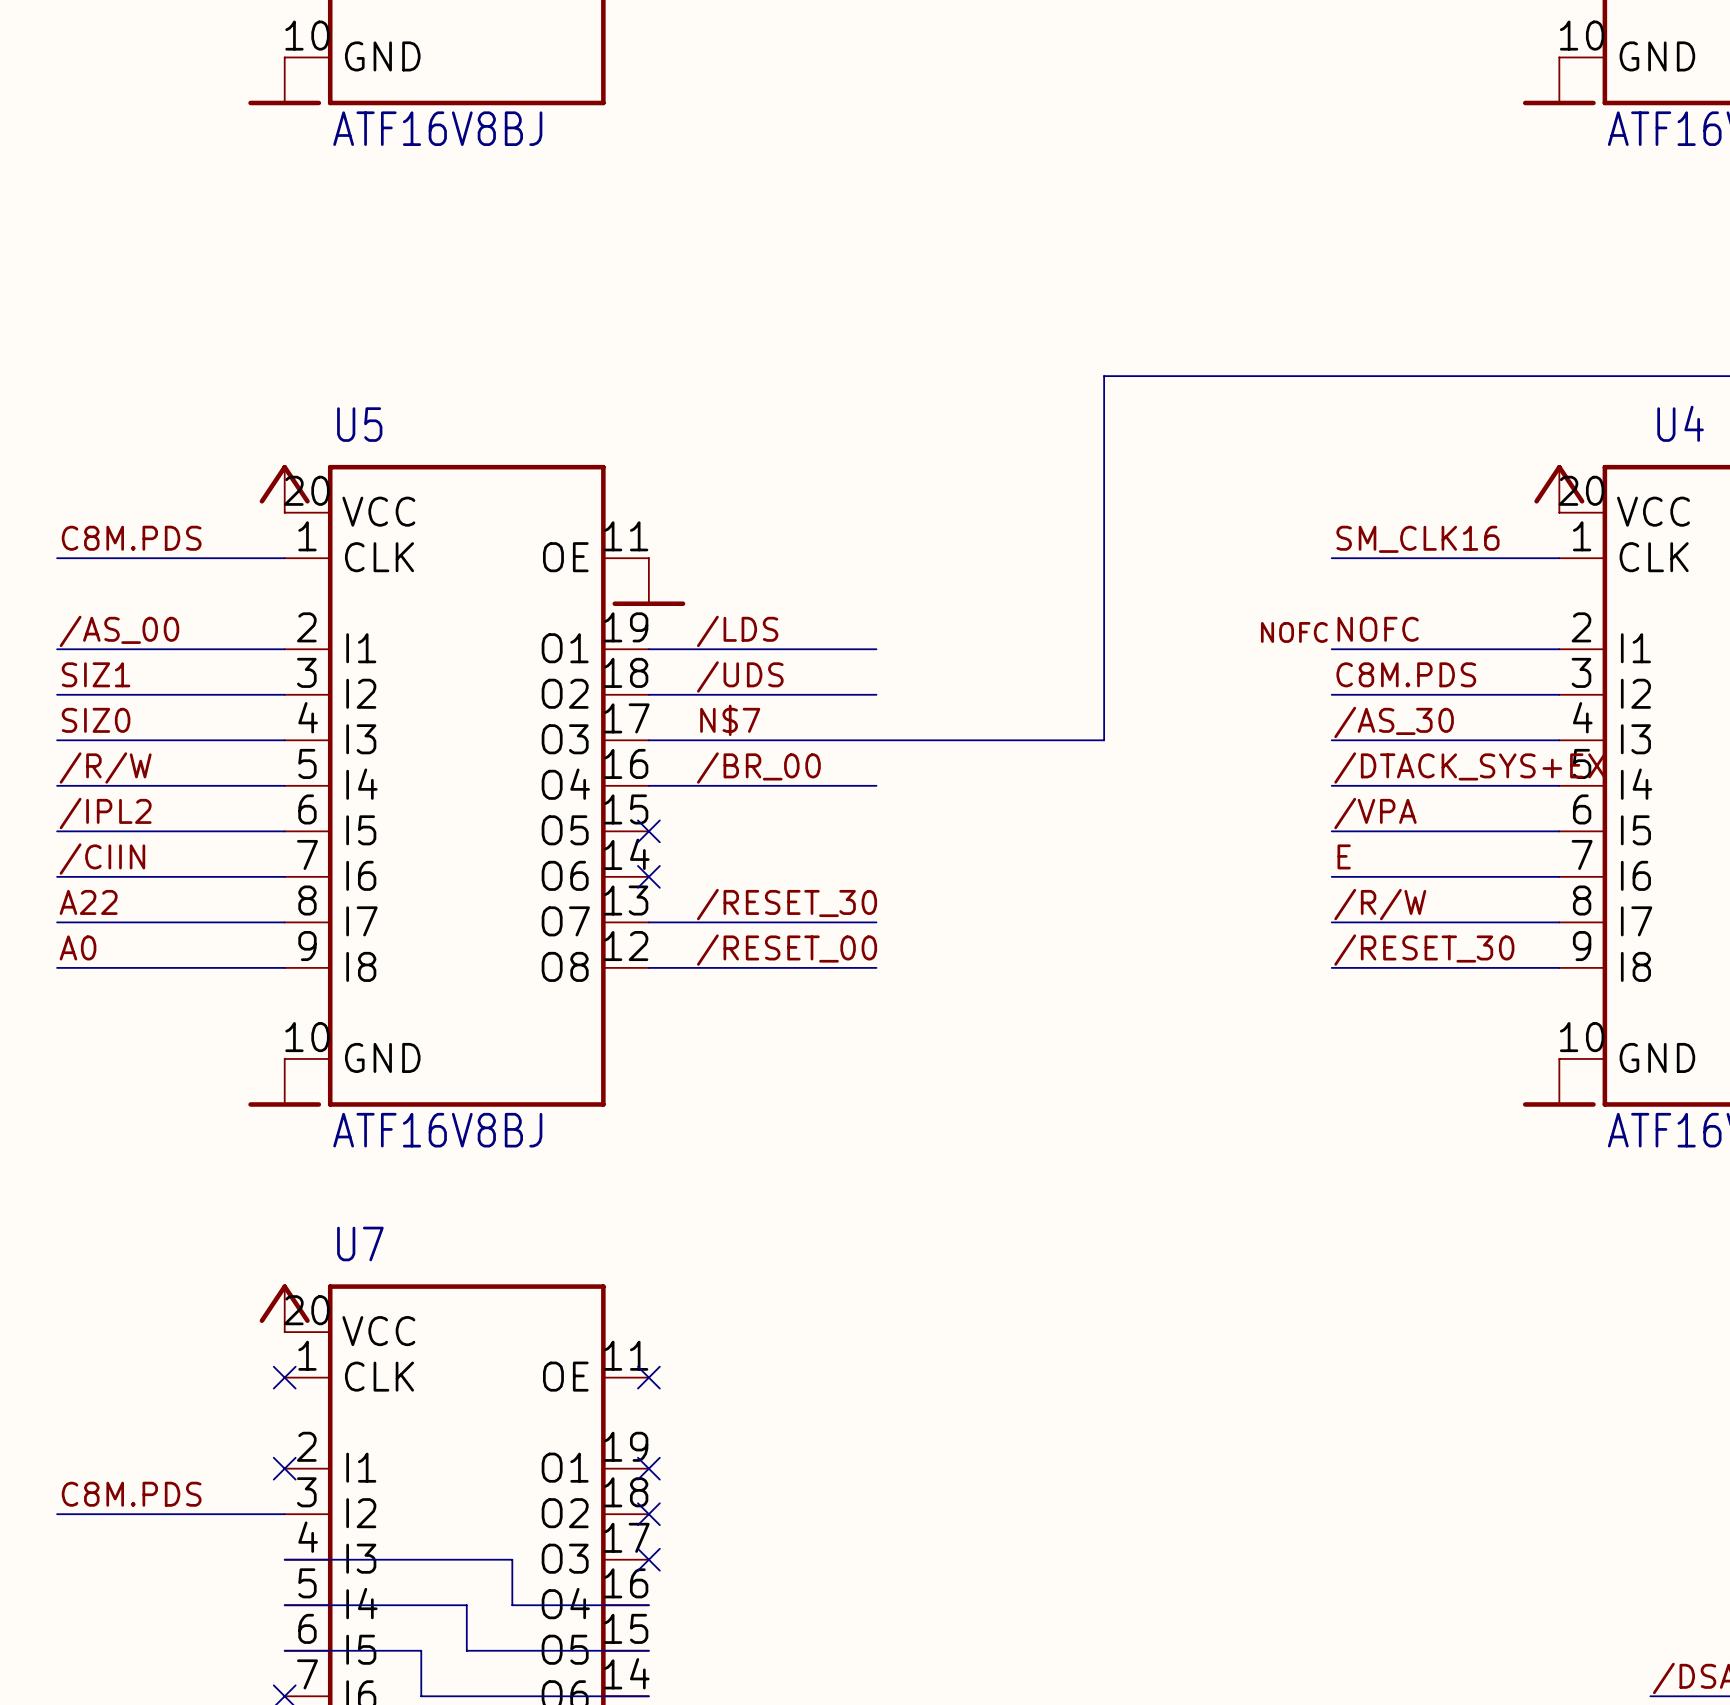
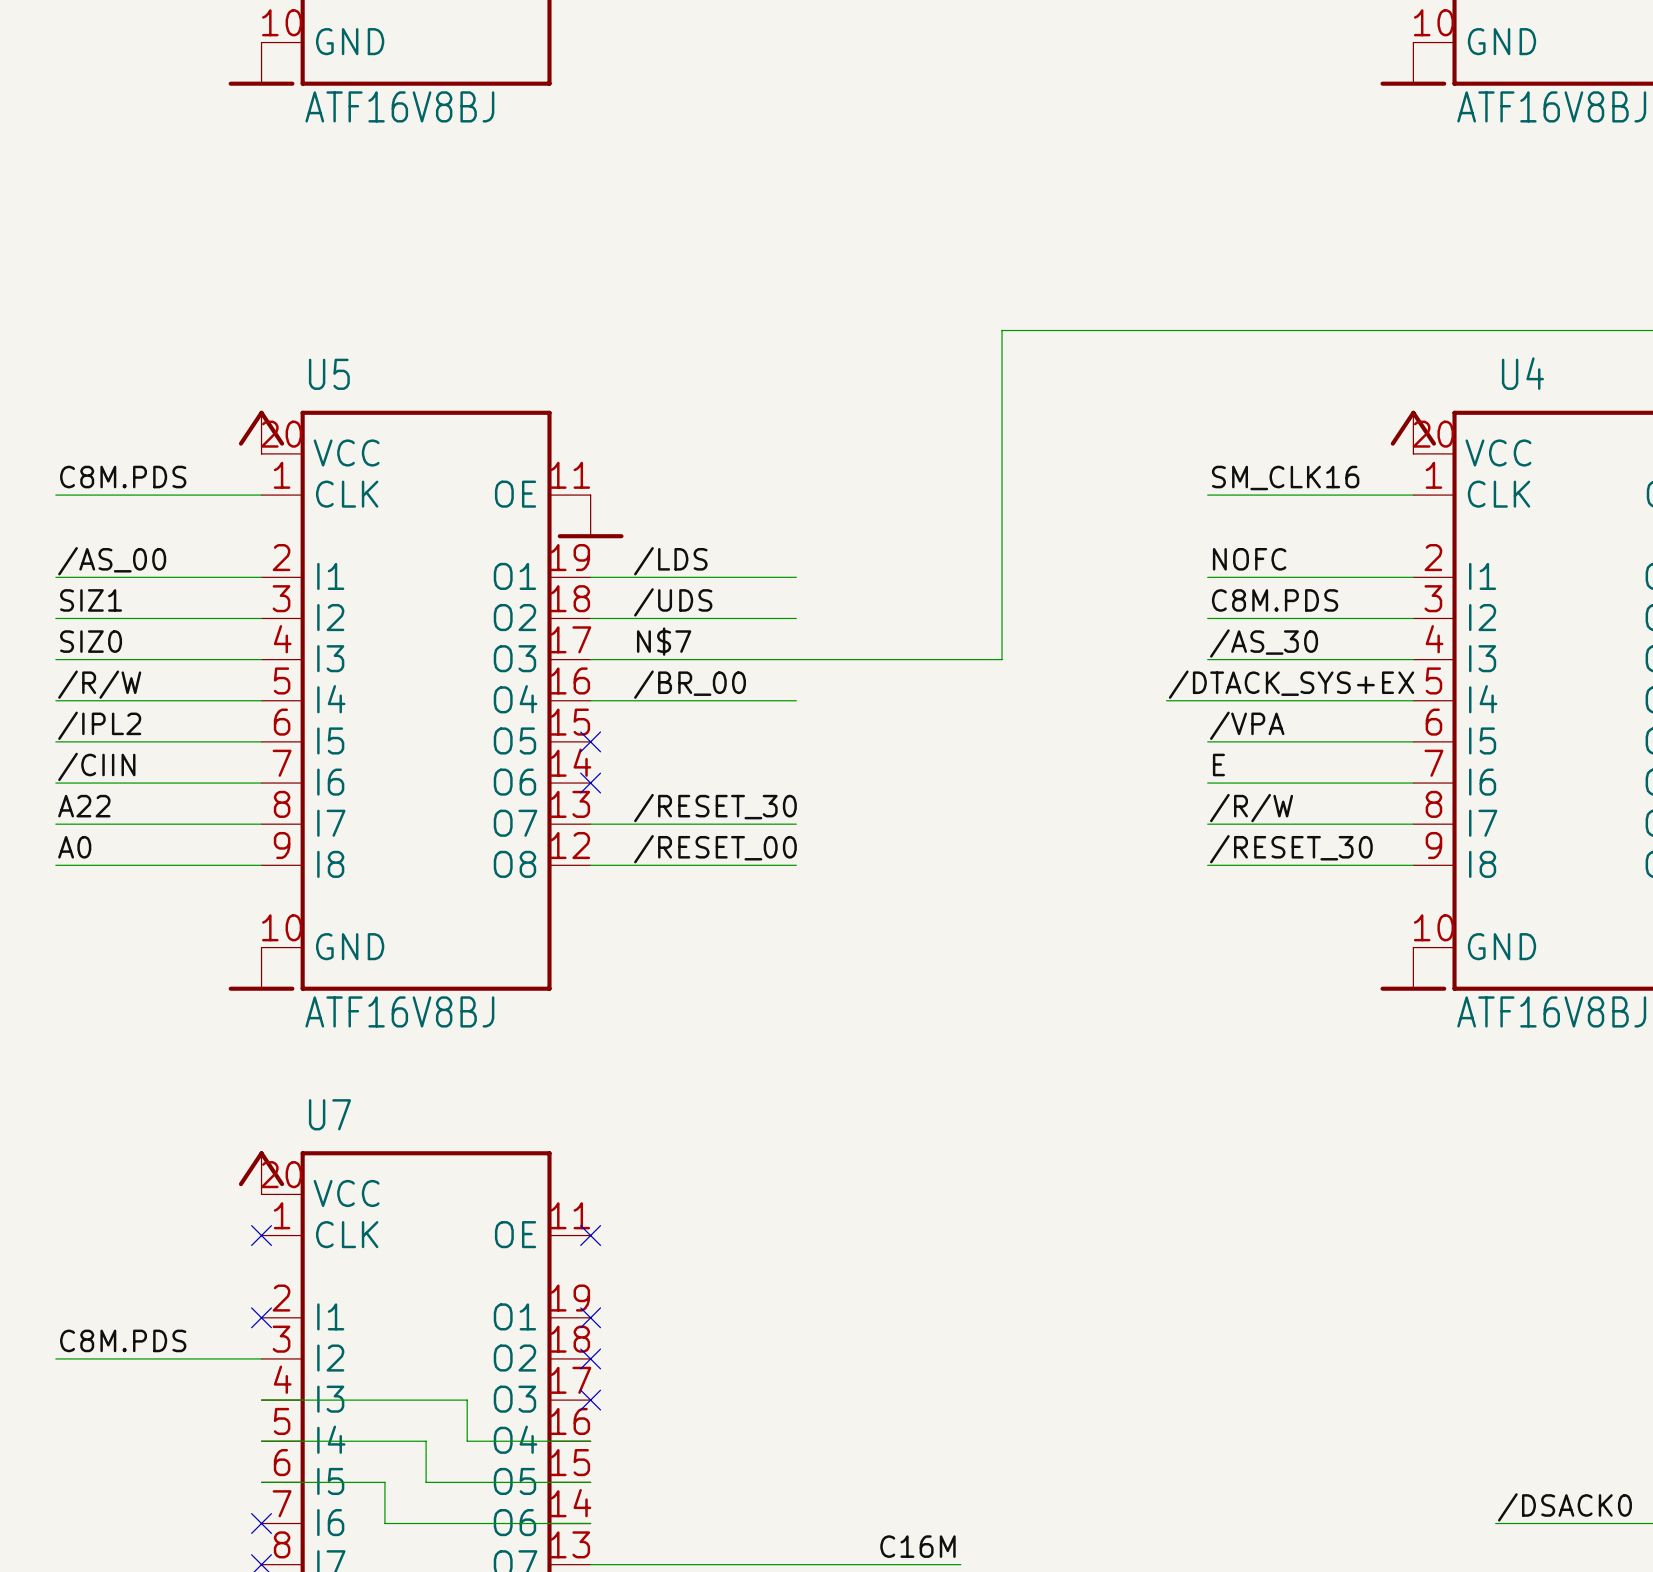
label: NOFC (1294, 632) -> none
label position: /DTACK_SYS+EX (1470, 767) -> /DTACK_SYS+EX (1291, 684)
wire: none -> (1166, 700) (1207, 700)

